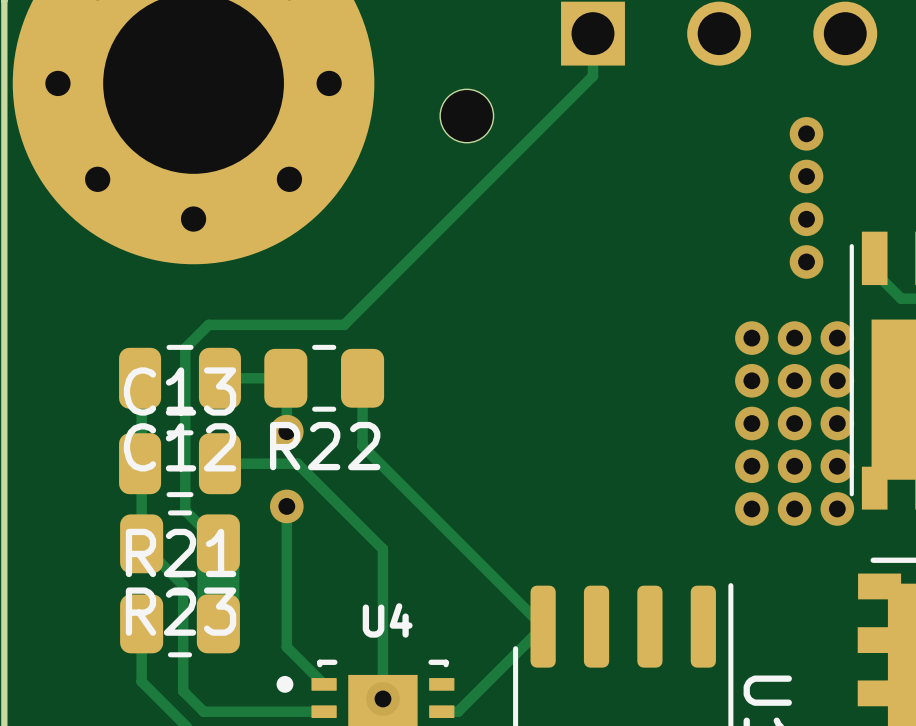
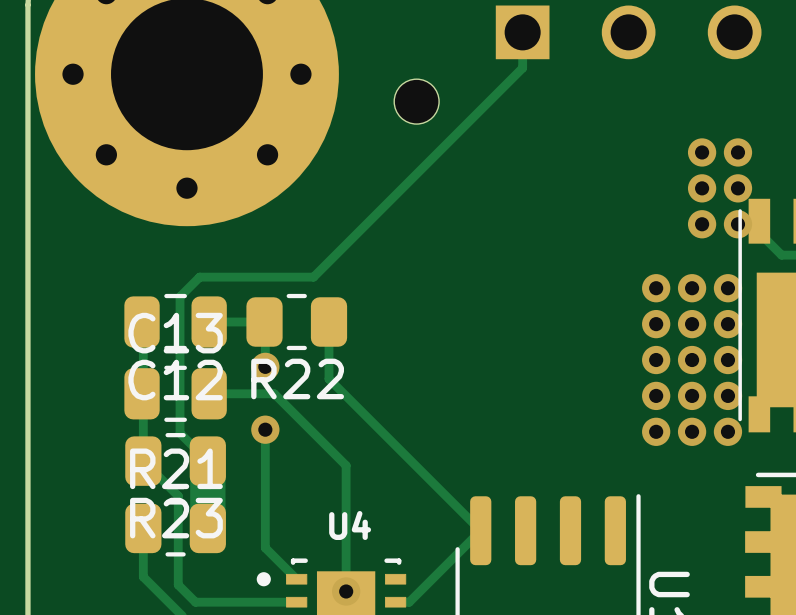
via: (806, 133) -> none
via: none -> (737, 152)
via: none -> (737, 188)
via: none -> (737, 224)

